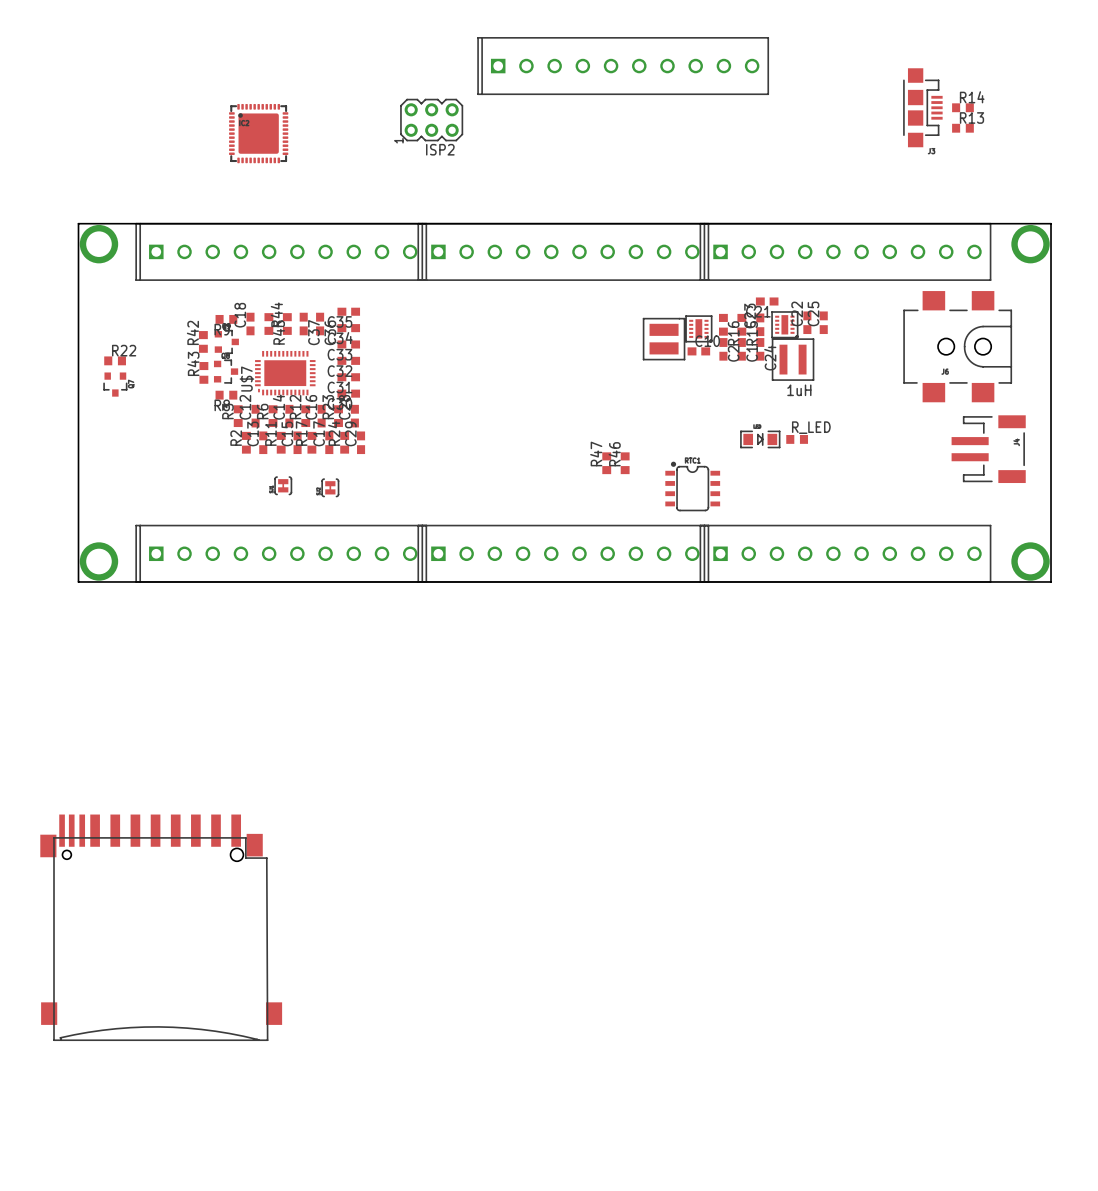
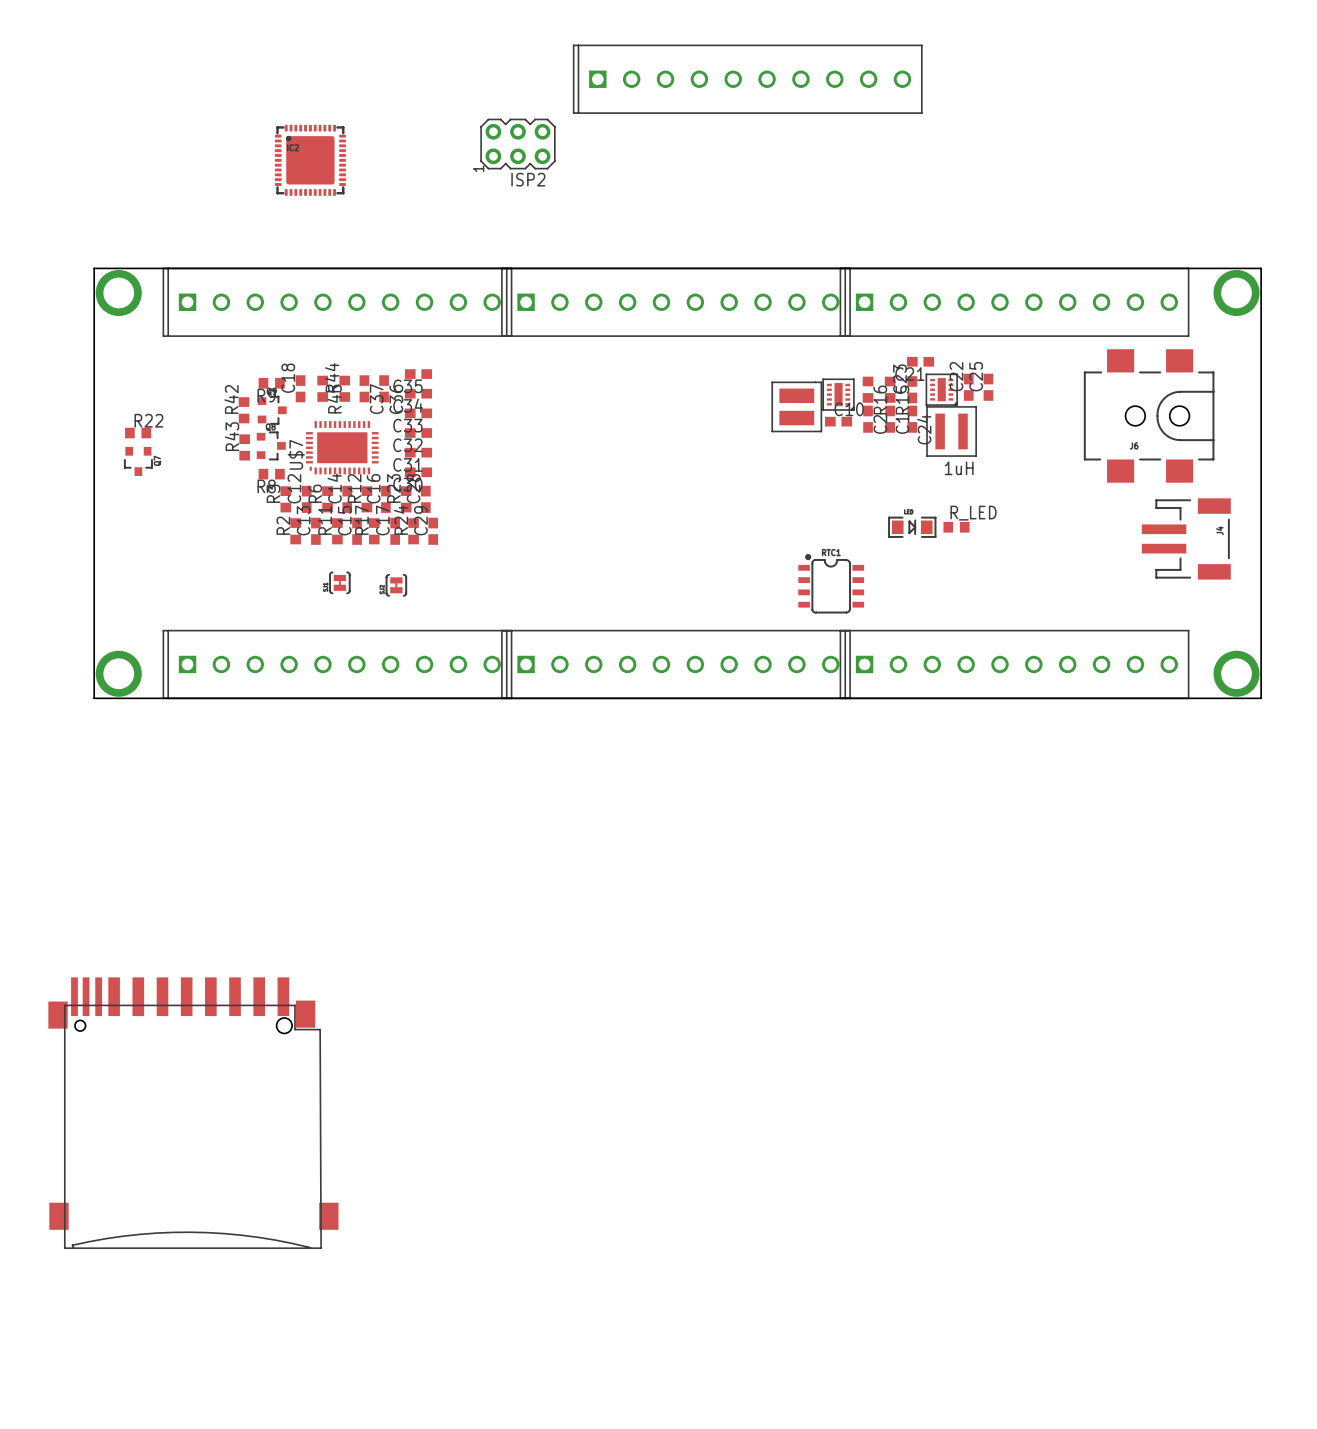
part: (922, 107) -> none
R14: (962, 107) -> none
R13: (962, 128) -> none
R47: (606, 463) -> none
R46: (625, 463) -> none

